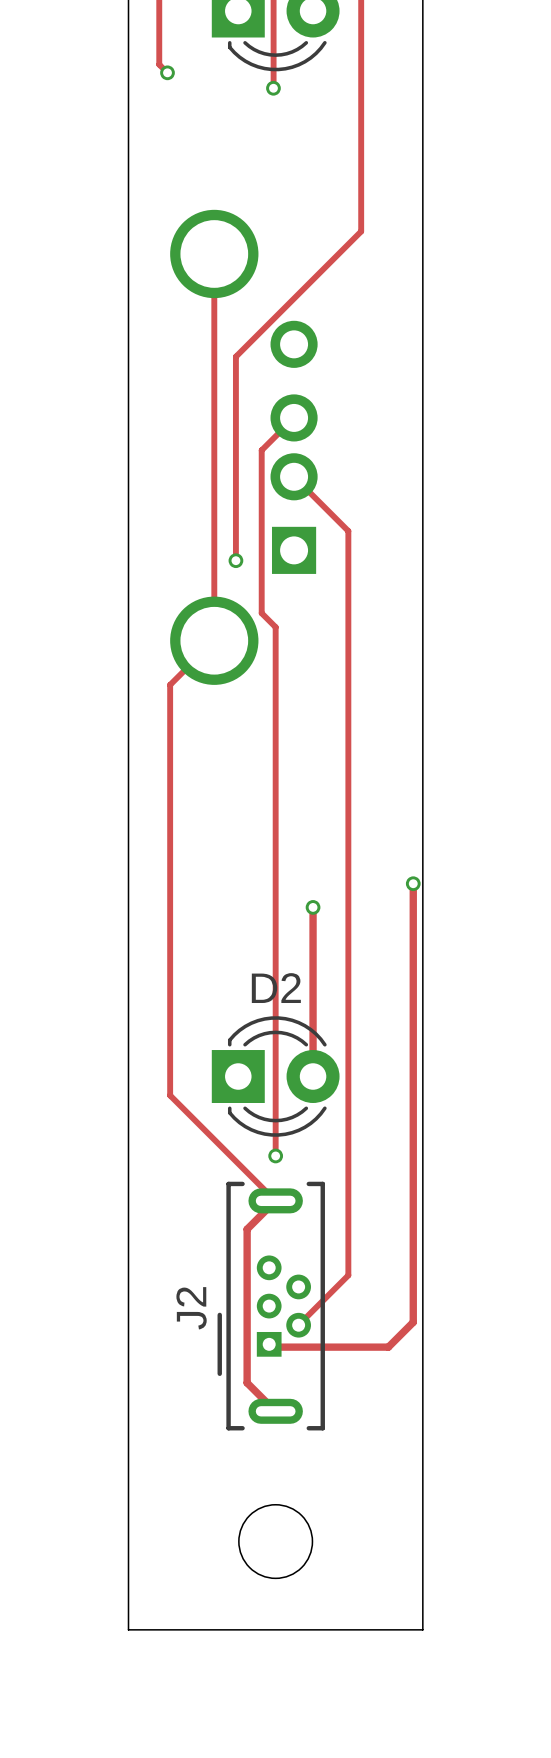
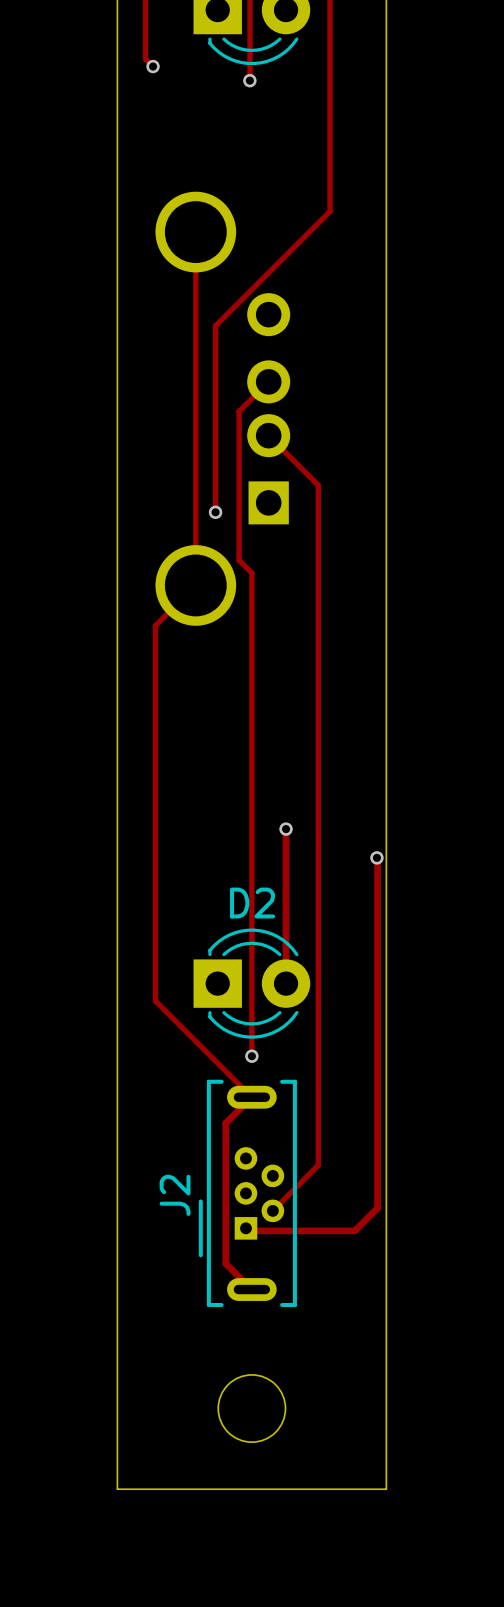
track: (413, 883) (413, 938) -> none
via position: (413, 883) -> (376, 857)

